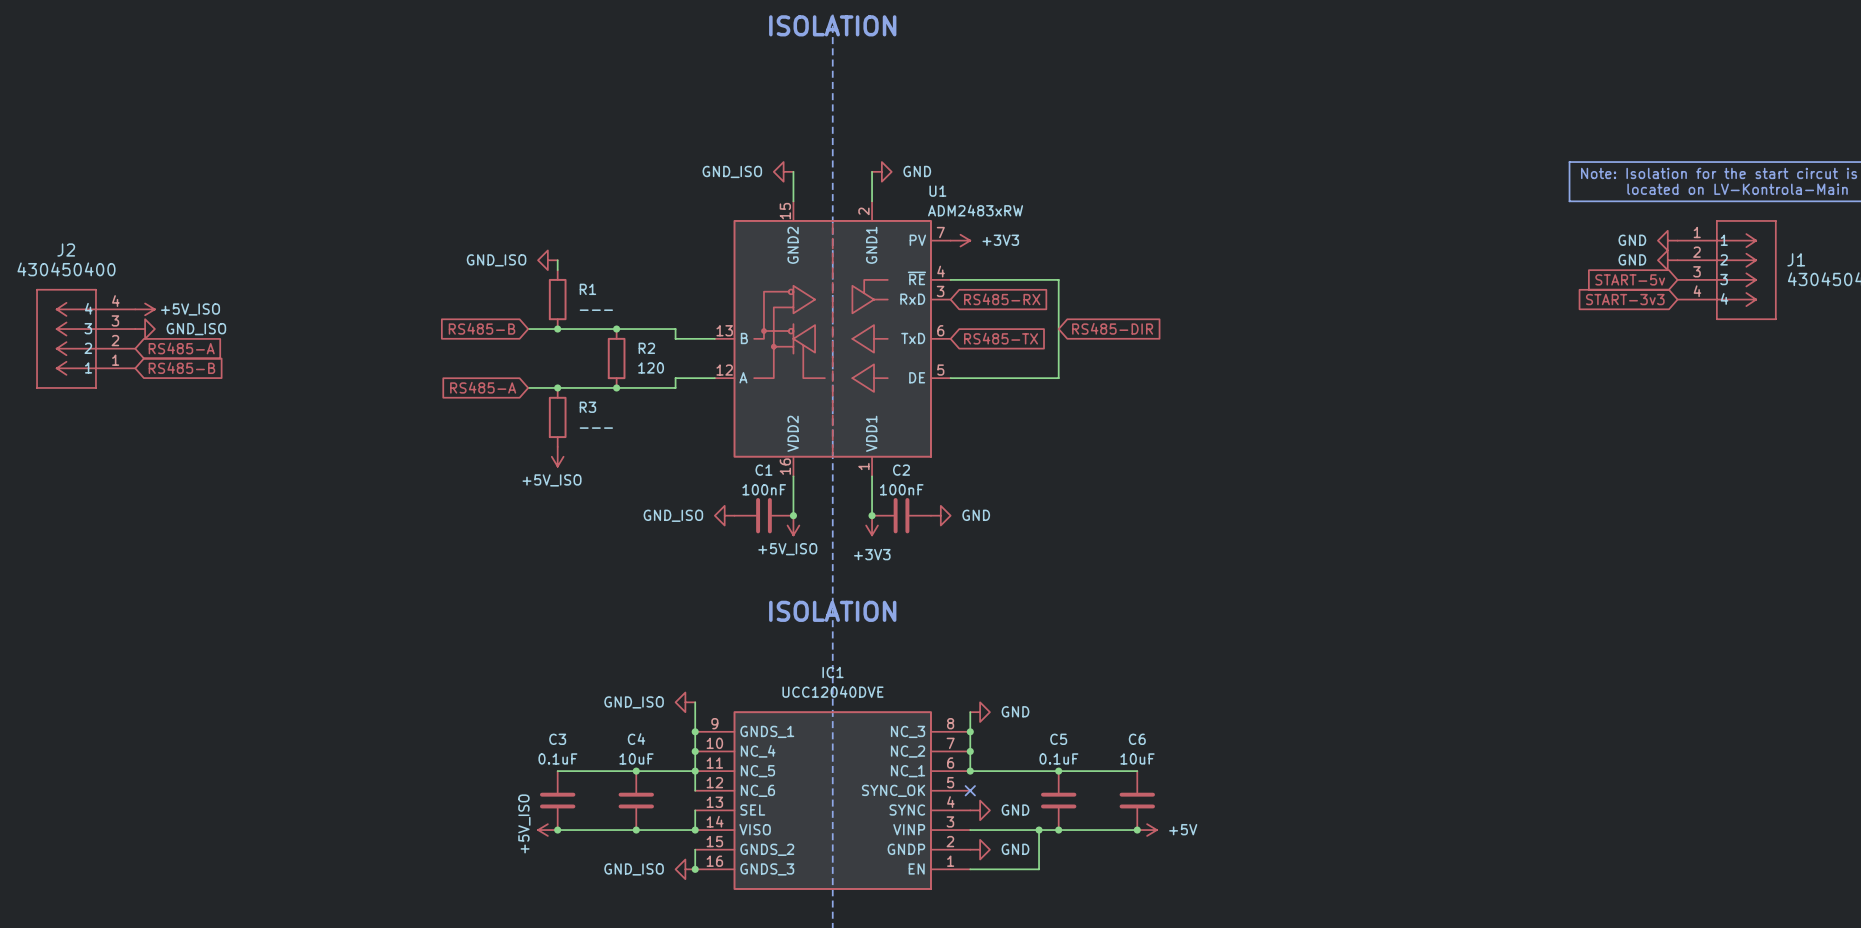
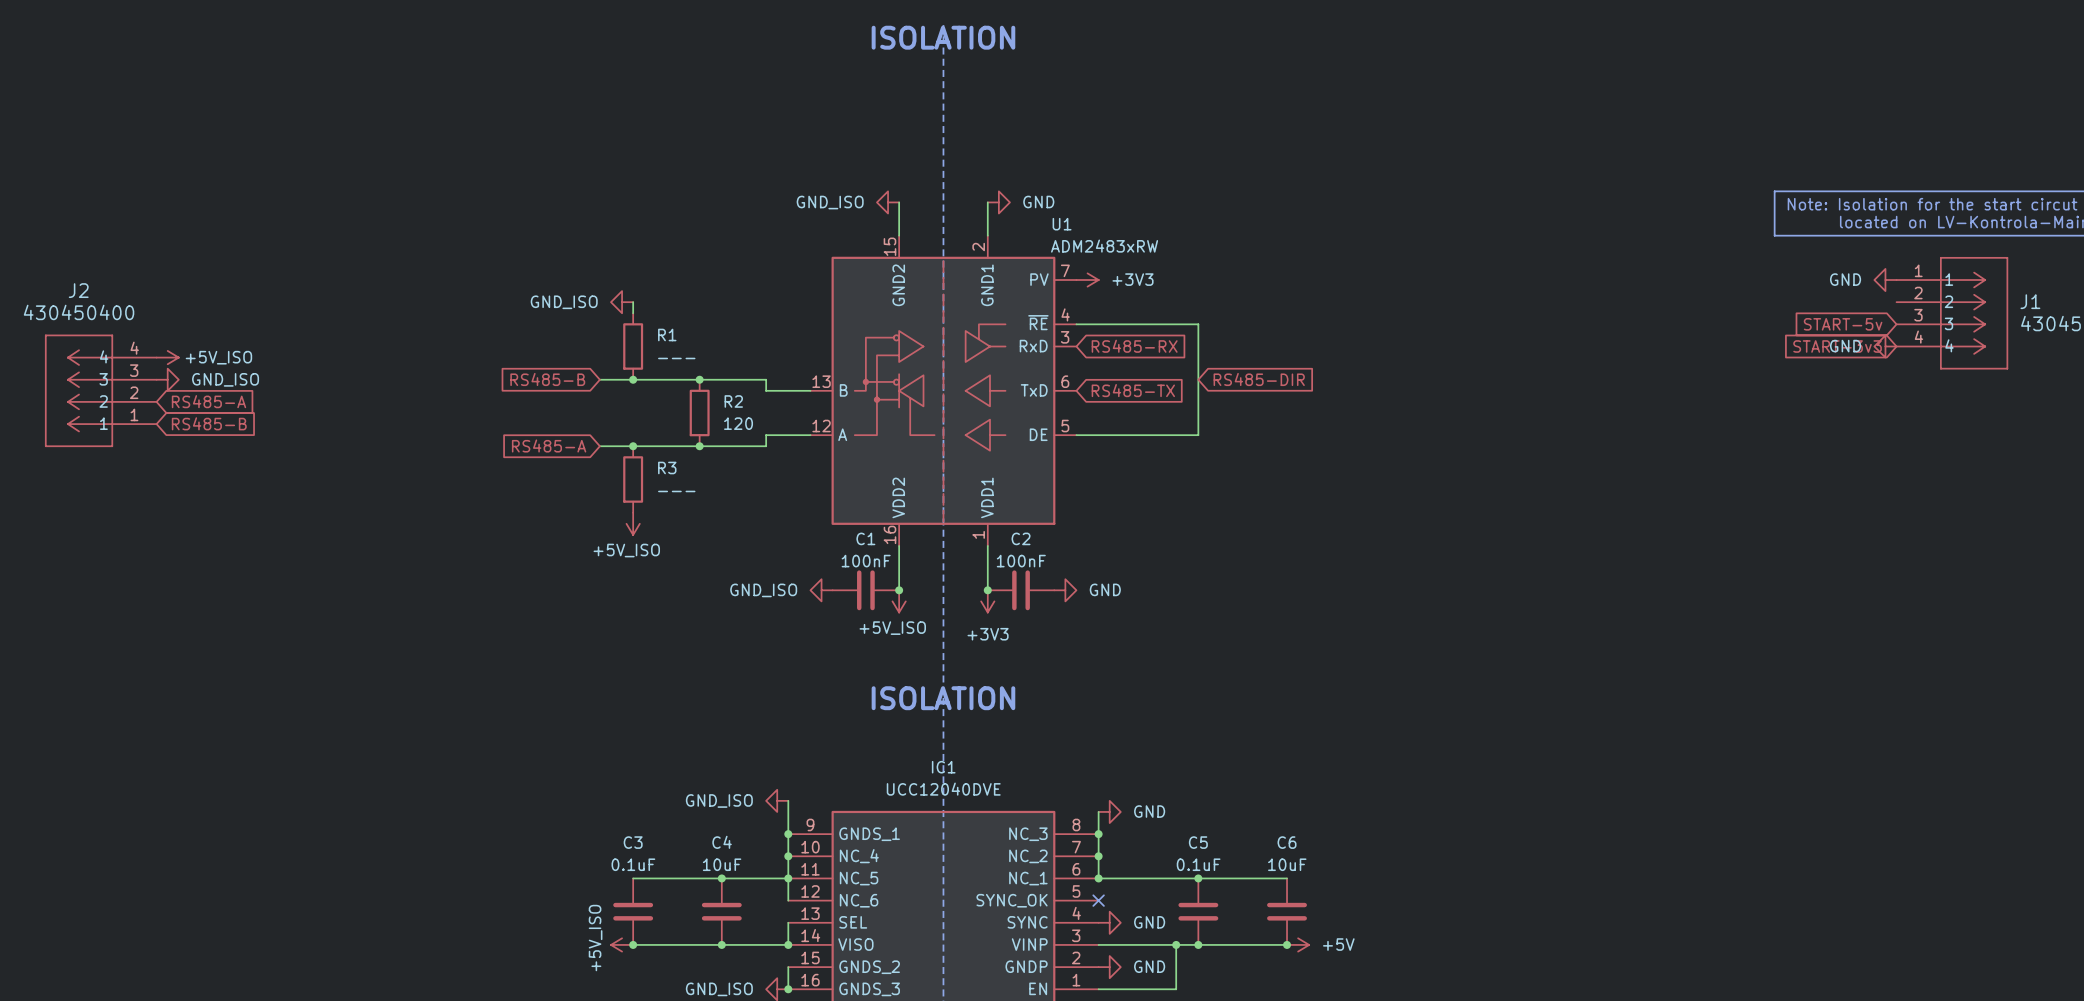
power symbol position: GND (1667, 260) -> GND (1885, 346)

